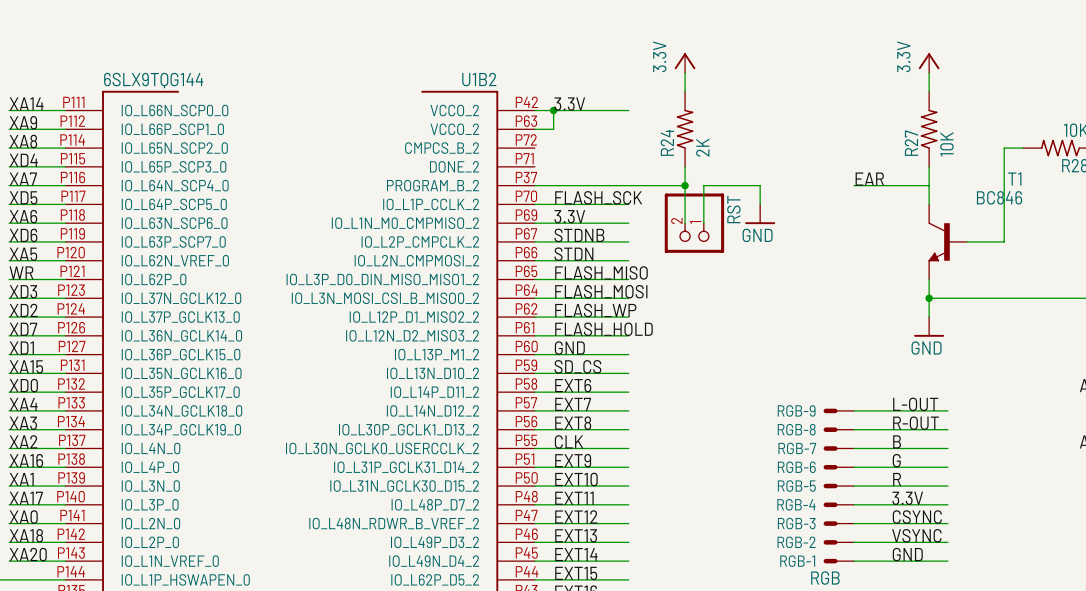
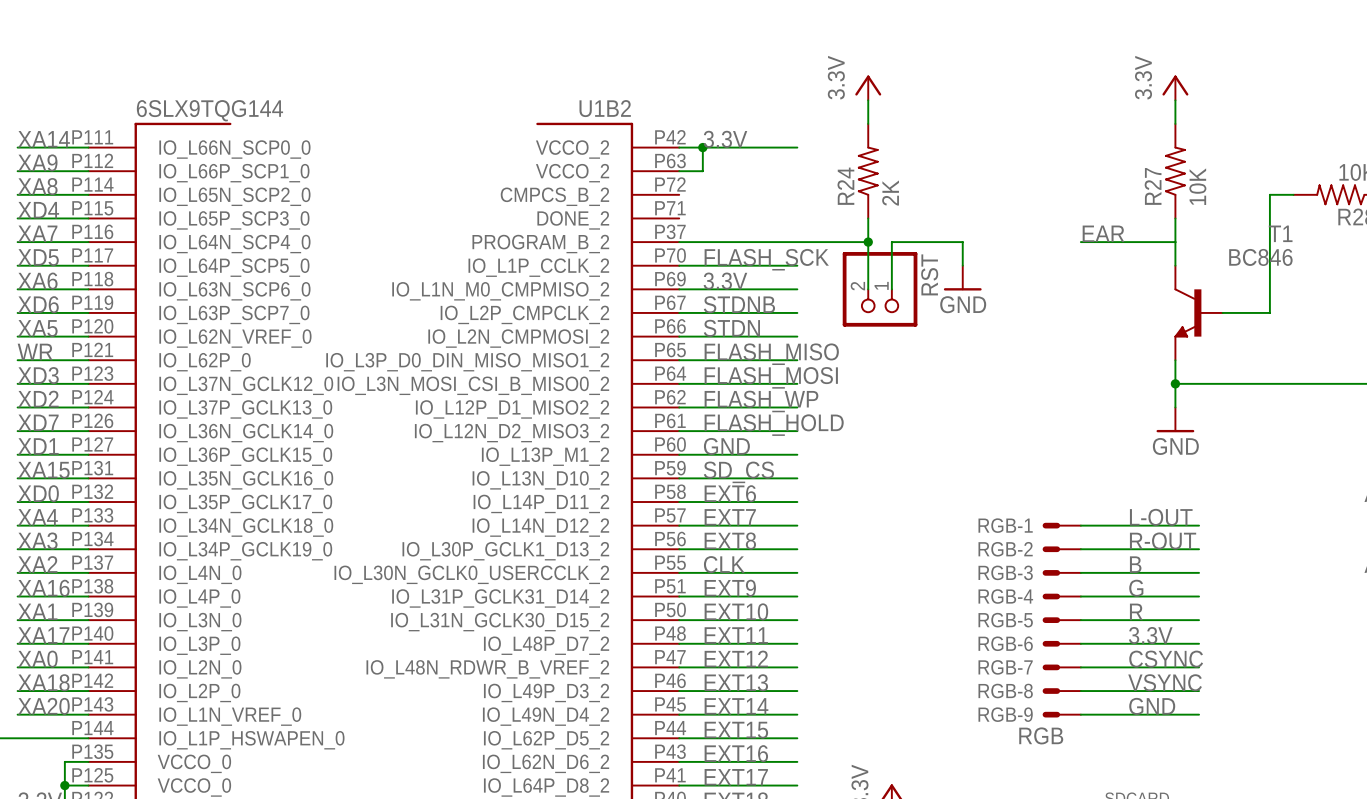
RGB-9 name: RGB-9 (796, 410) -> RGB-1 (1005, 525)
RGB-8 name: RGB-8 (796, 429) -> RGB-2 (1005, 549)
RGB-7 name: RGB-7 (797, 448) -> RGB-3 (1005, 572)
RGB-6 name: RGB-6 (796, 467) -> RGB-4 (1005, 596)
RGB-4 name: RGB-4 (796, 504) -> RGB-6 (1005, 643)
RGB-3 name: RGB-3 (796, 523) -> RGB-7 (1005, 667)
RGB-2 name: RGB-2 (796, 542) -> RGB-8 (1005, 691)
RGB-1 name: RGB-1 (797, 561) -> RGB-9 (1005, 714)

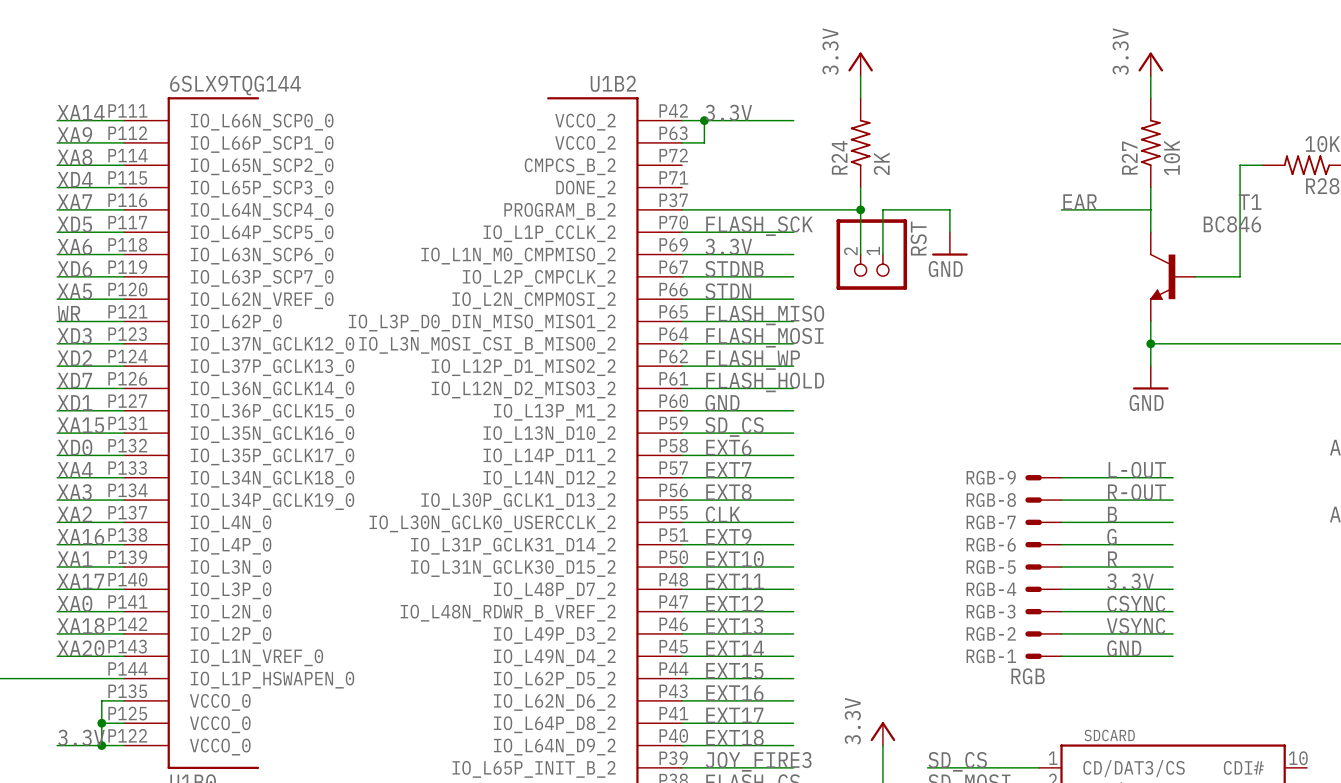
RGB-1 name: RGB-1 (1005, 525) -> RGB-9 (991, 477)
RGB-2 name: RGB-2 (1005, 549) -> RGB-8 (991, 500)
RGB-3 name: RGB-3 (1005, 572) -> RGB-7 (991, 522)
RGB-4 name: RGB-4 (1005, 596) -> RGB-6 (991, 544)
RGB-6 name: RGB-6 (1005, 643) -> RGB-4 (991, 589)
RGB-7 name: RGB-7 (1005, 667) -> RGB-3 (991, 611)
RGB-8 name: RGB-8 (1005, 691) -> RGB-2 (991, 633)
RGB-9 name: RGB-9 (1005, 714) -> RGB-1 (991, 656)

